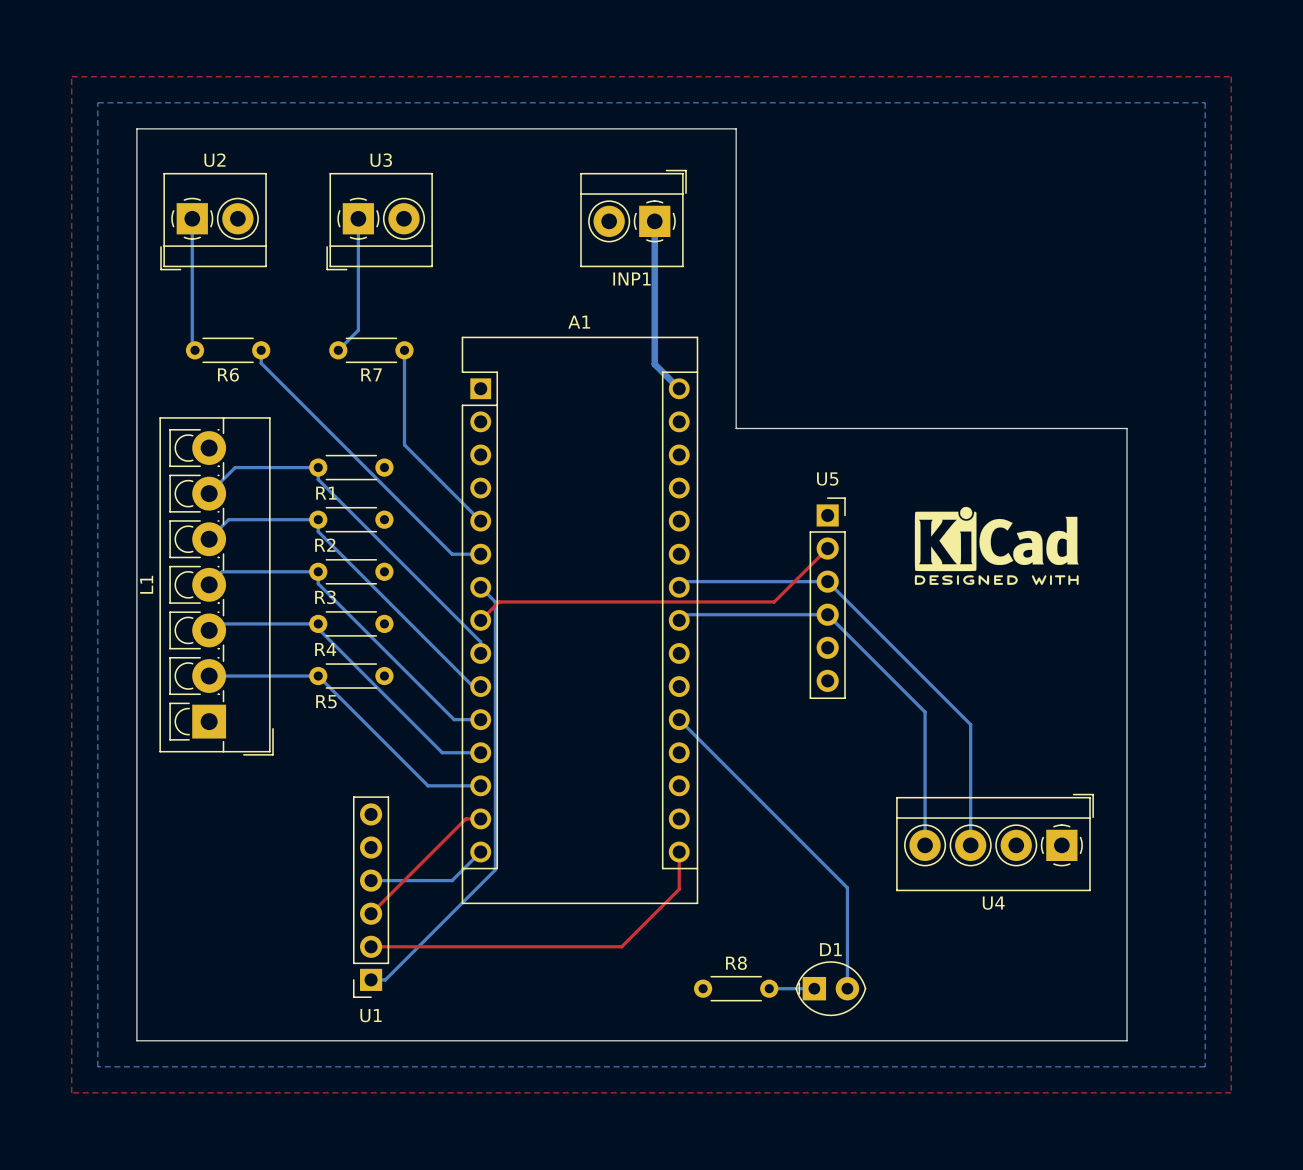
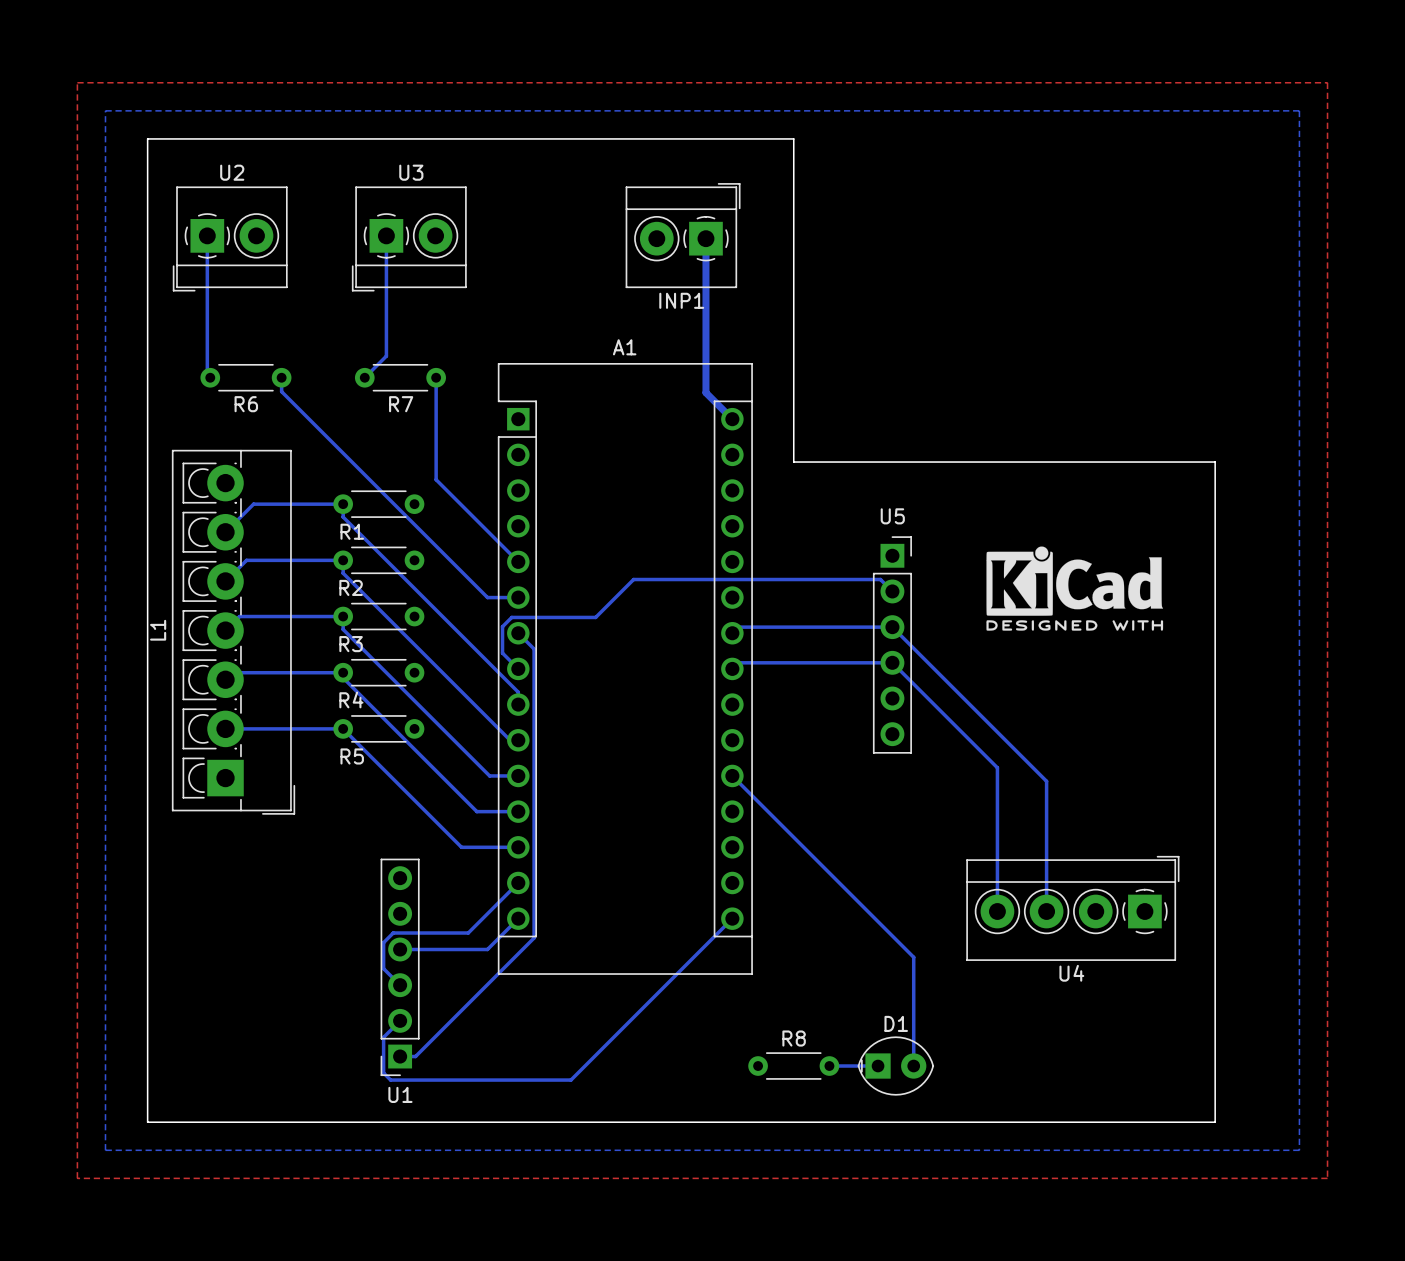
bottom track: none -> (892, 591) (880, 579) (633, 579) (595, 617) (511, 617) (502, 626) (502, 653) (518, 668)
top track: (827, 548) (774, 601) (499, 601) (480, 620) -> none
bottom track: none -> (518, 882) (468, 933) (393, 933) (383, 942) (383, 968) (400, 985)
top track: (480, 818) (465, 818) (371, 913) -> none
bottom track: none -> (732, 918) (570, 1080) (390, 1080) (383, 1073) (383, 1037) (400, 1020)
top track: (679, 852) (679, 889) (621, 946) (371, 946) -> none

